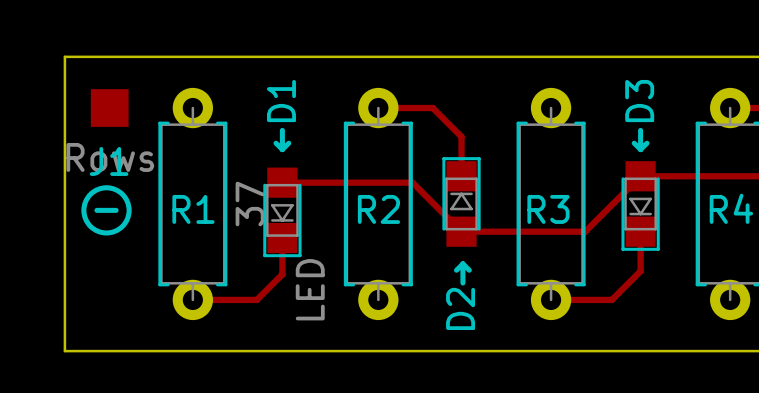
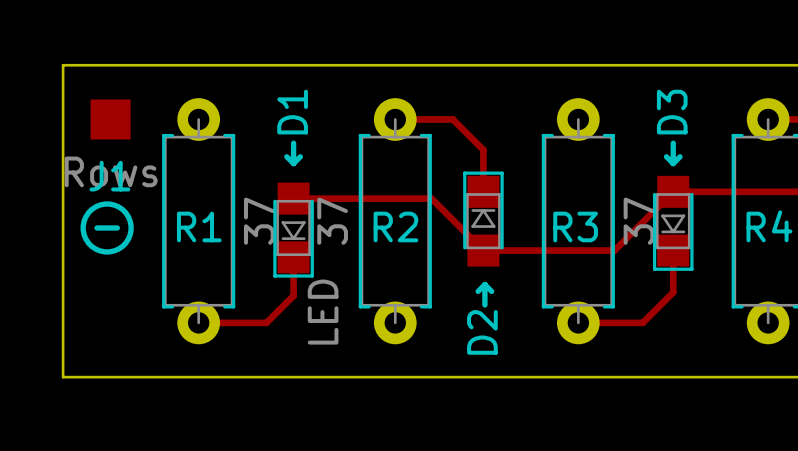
R2 value: none -> 37 (332, 221)
R3 value: none -> 37 (639, 221)

